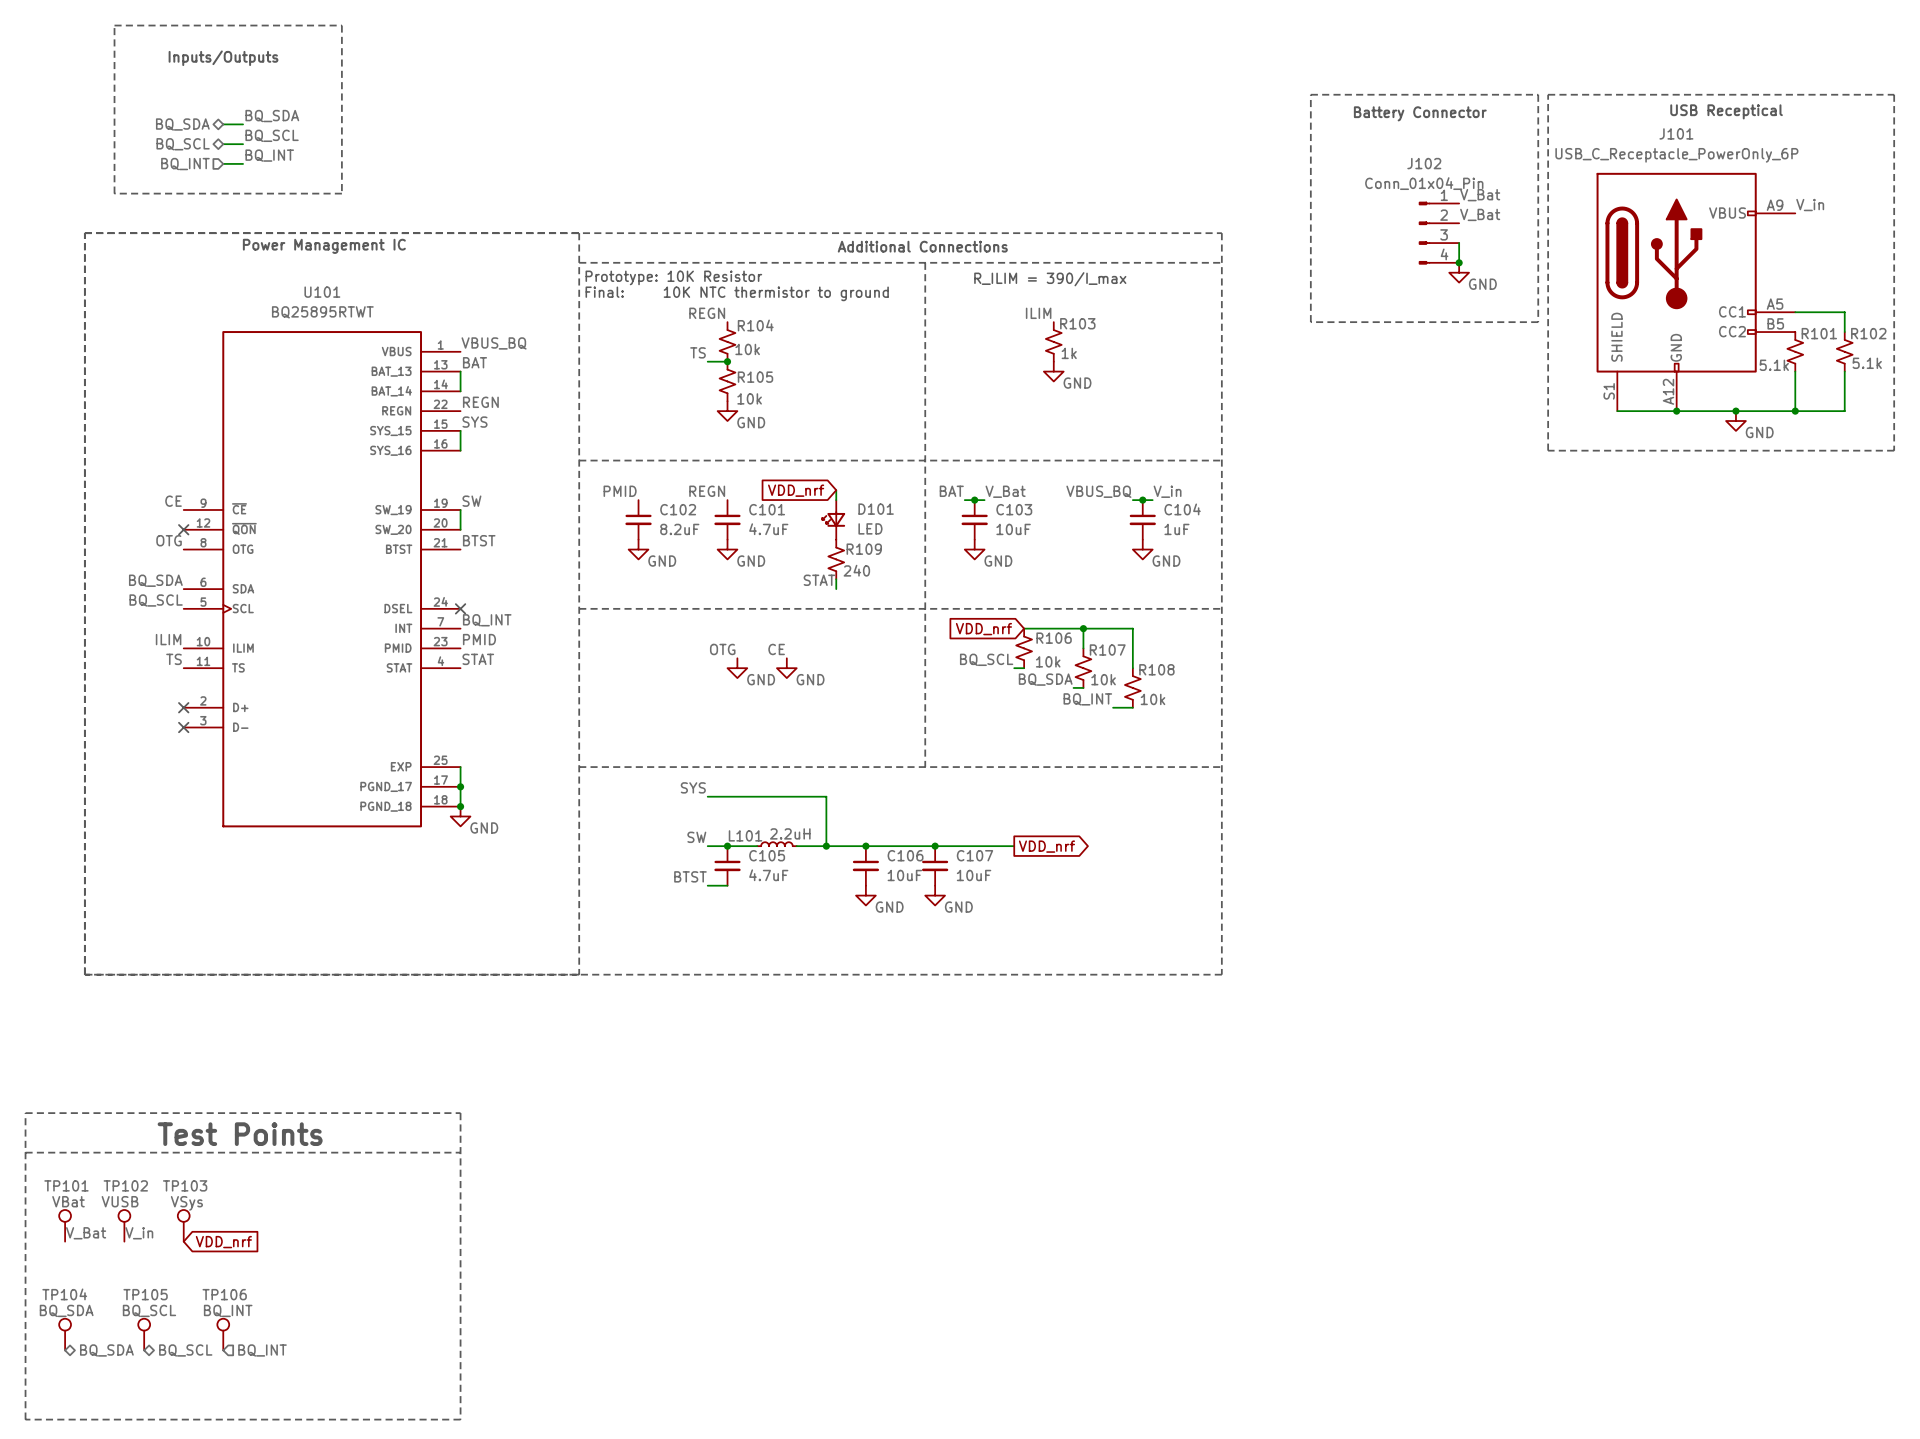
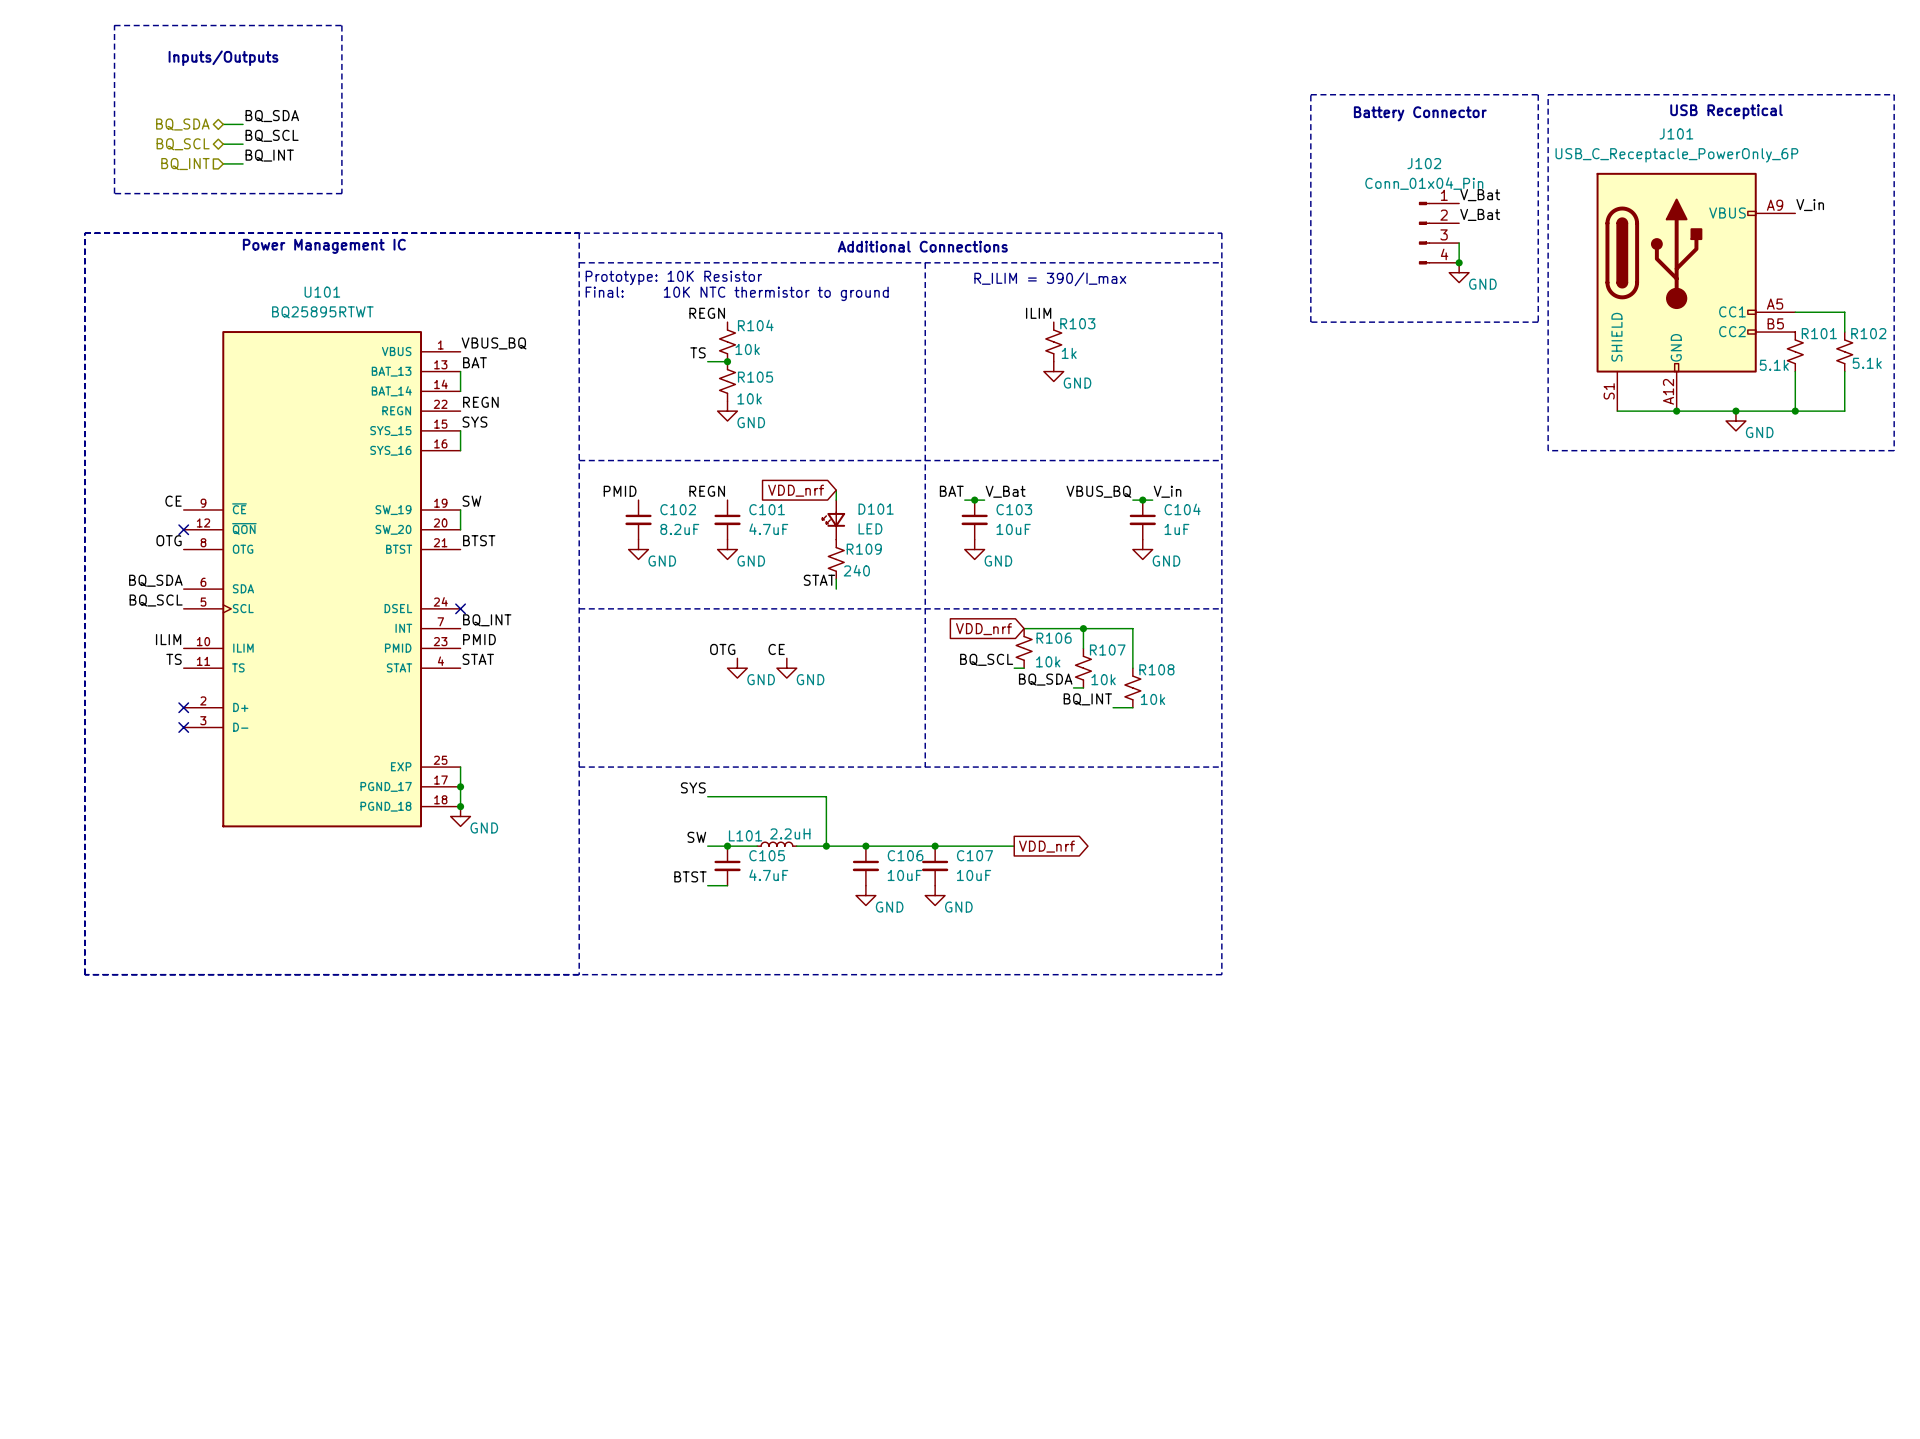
line: (25, 1113) (460, 1113) (460, 1419) (25, 1419) (25, 1113) -> none
text: Test Points (240, 1134) -> none
line: (25, 1152) (460, 1152) -> none
TP101: VBat (65, 1225) -> none
TP102: VUSB (124, 1225) -> none
TP103: VSys (183, 1225) -> none
label: V_Bat (86, 1233) -> none
label: V_in (139, 1233) -> none
global label: VDD_nrf (223, 1242) -> none
TP104: BQ_SDA (65, 1334) -> none
TP105: BQ_SCL (144, 1334) -> none
TP106: BQ_INT (223, 1334) -> none
hierarchical label: BQ_SDA (106, 1350) -> none
hierarchical label: BQ_SCL (185, 1350) -> none
hierarchical label: BQ_INT (262, 1350) -> none

